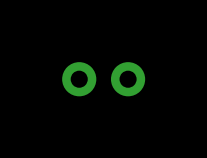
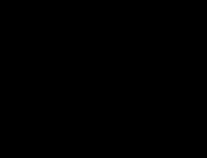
part: (103, 79) -> none

